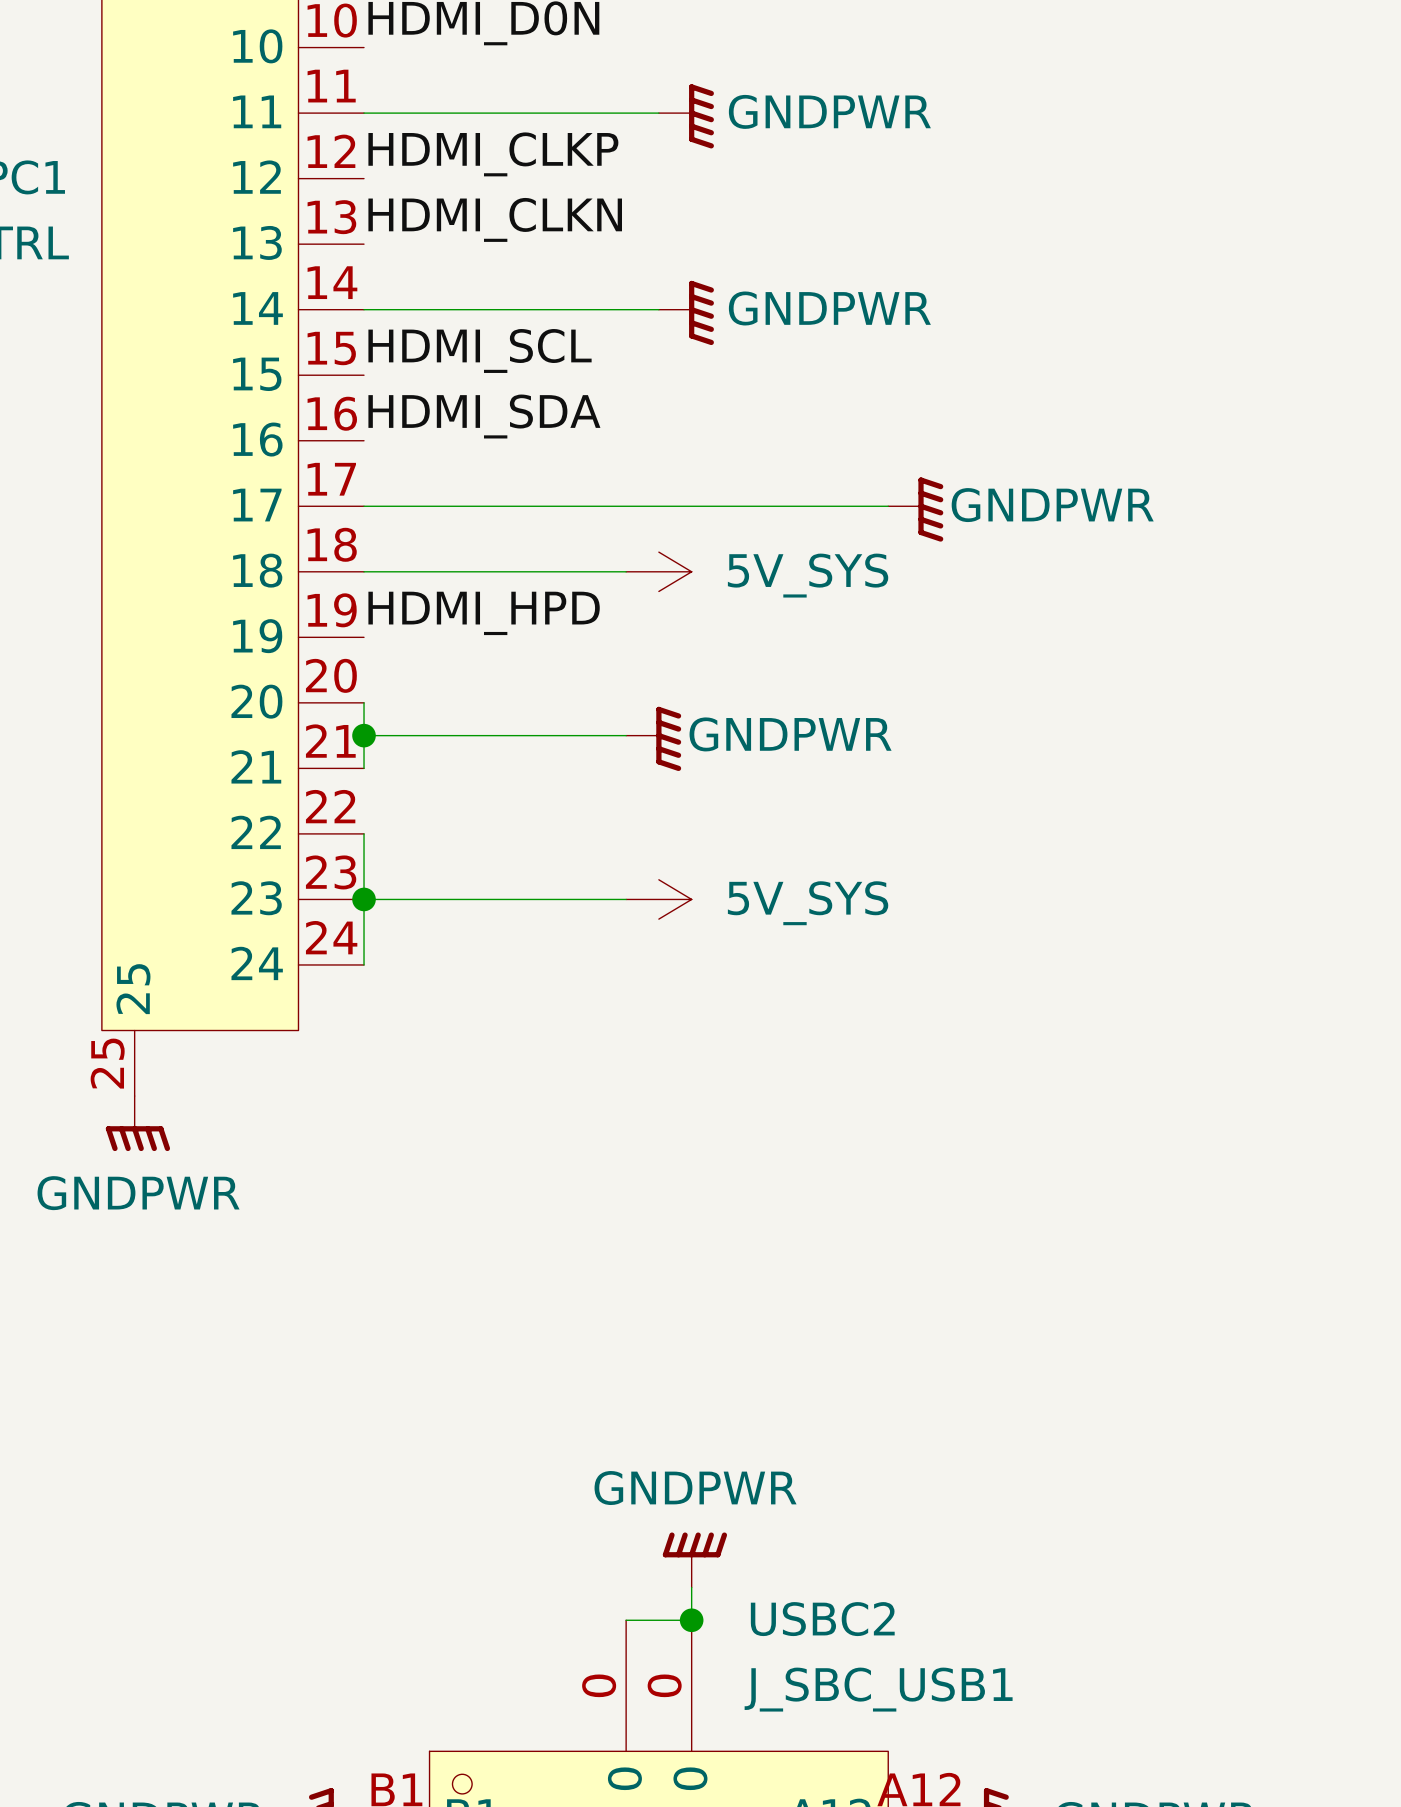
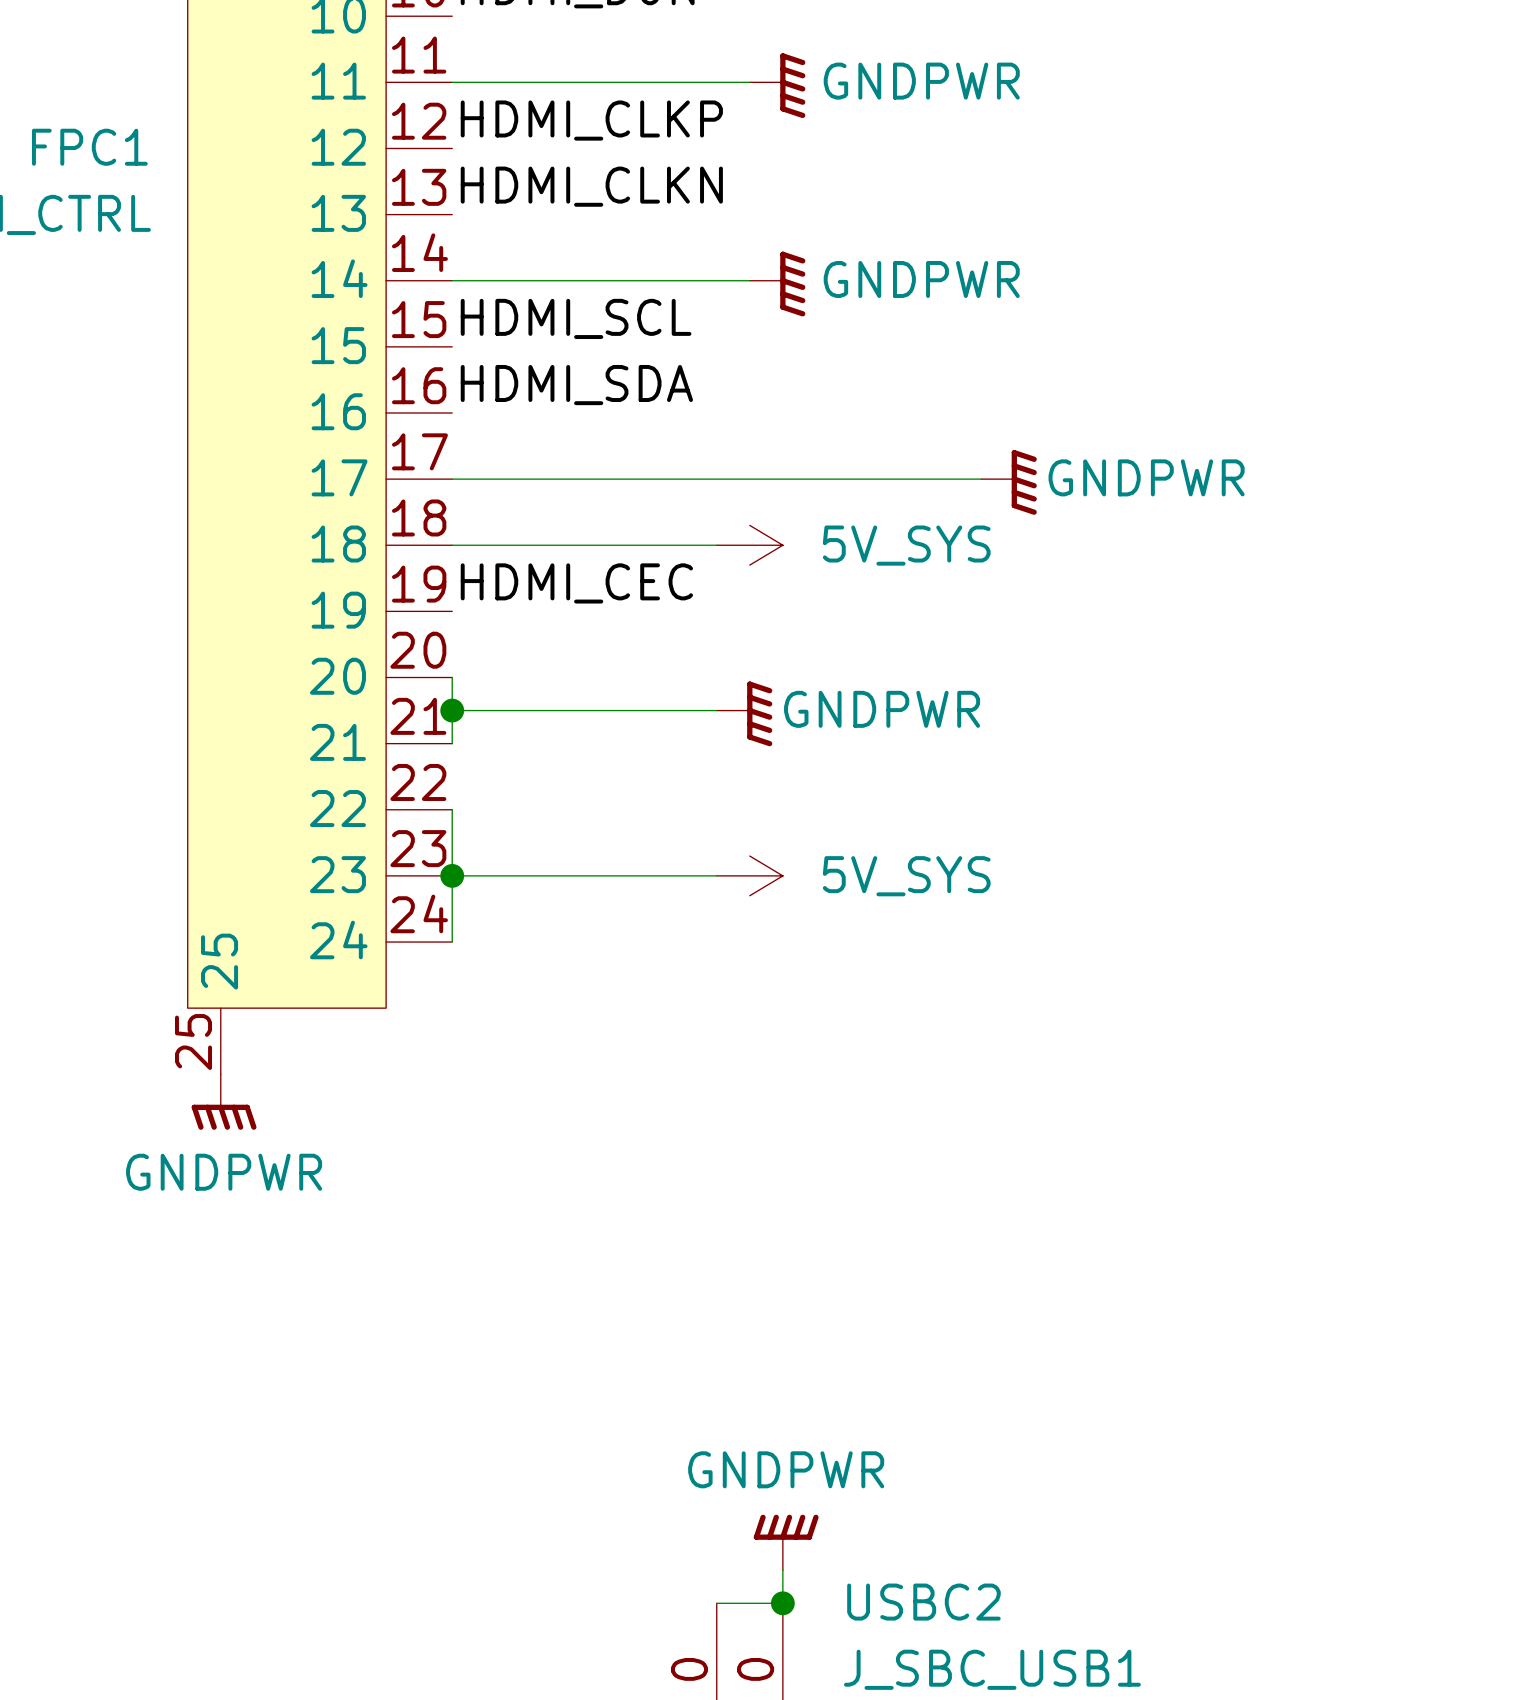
label: HDMI_HPD (484, 613) -> HDMI_CEC (576, 583)

